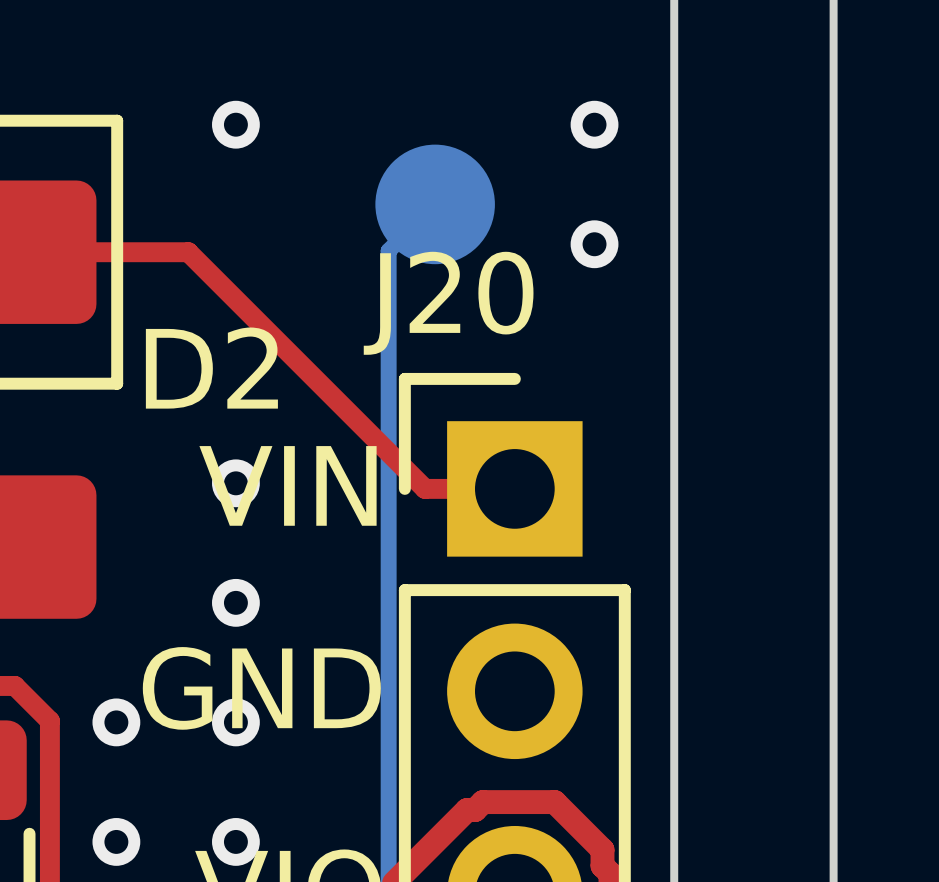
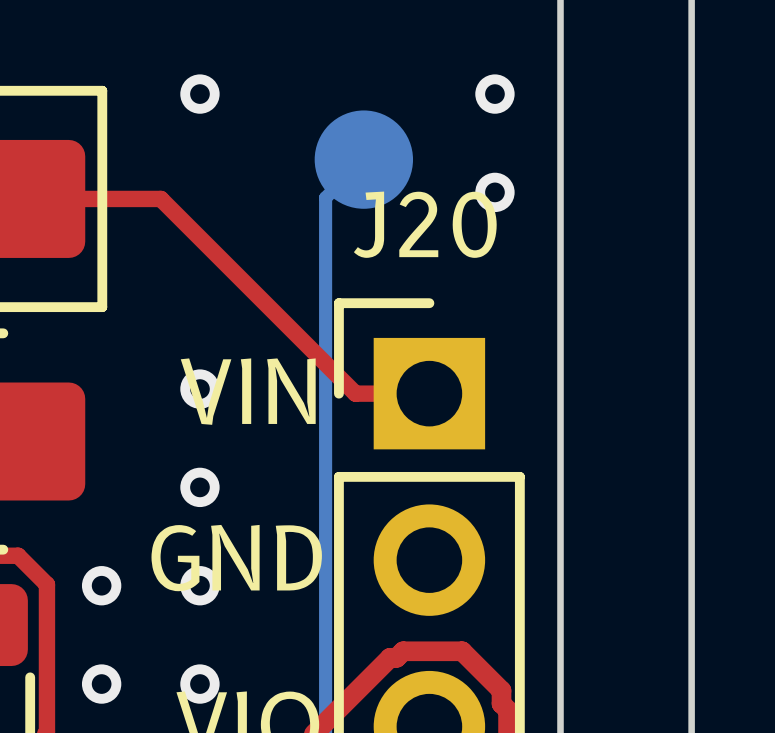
J20 name position: J20 (448, 303) -> J20 (425, 224)
D2 name: D2 (211, 368) -> none

